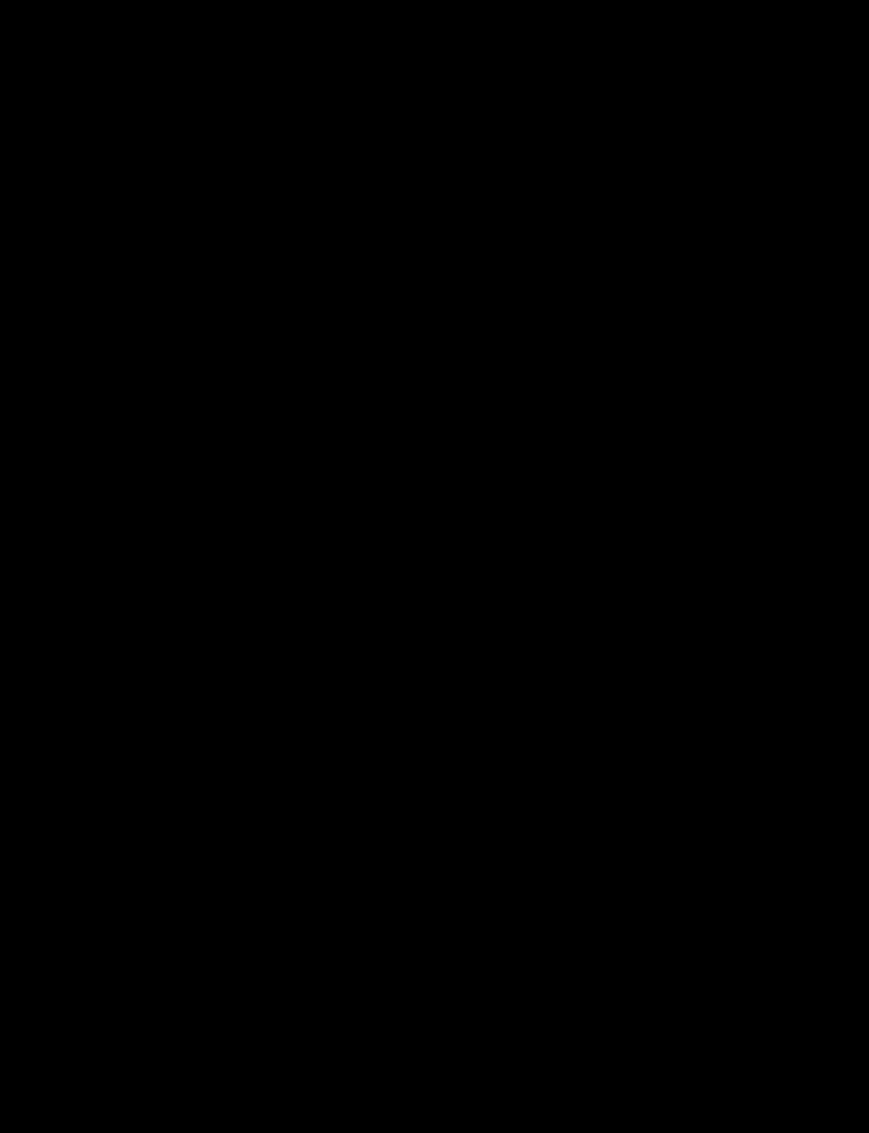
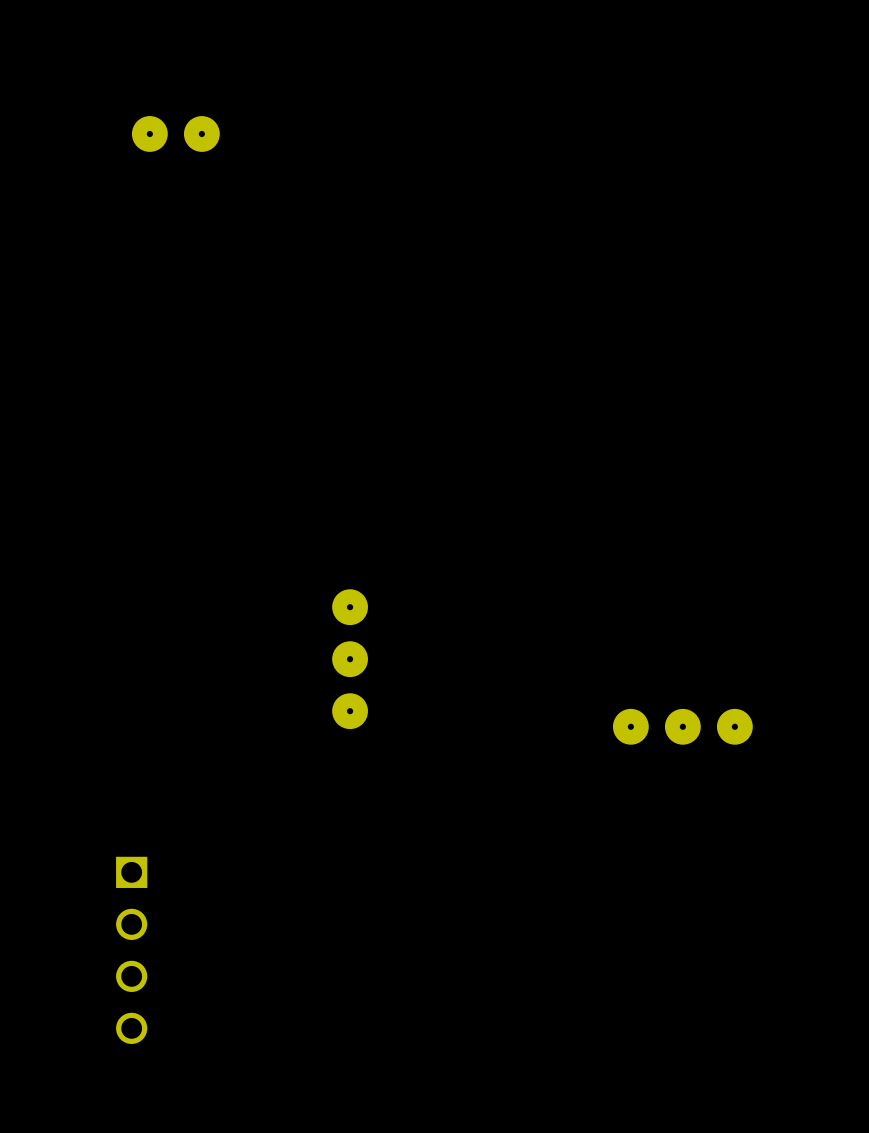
part: none -> (175, 133)
part: none -> (350, 659)
part: none -> (682, 726)
part: none -> (131, 950)

